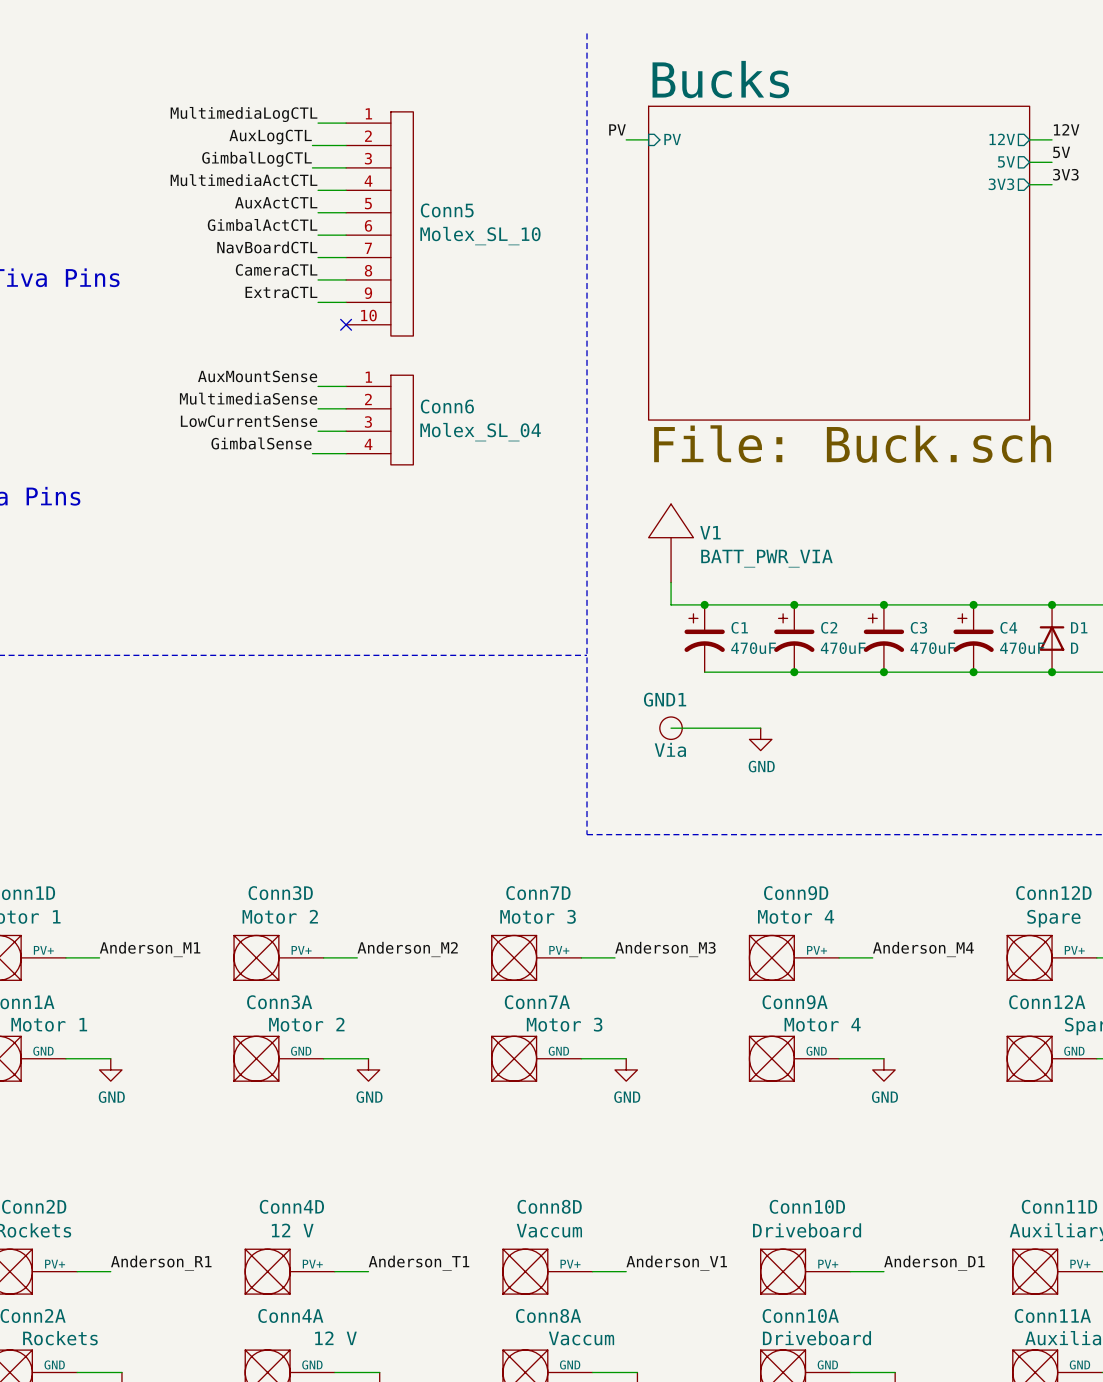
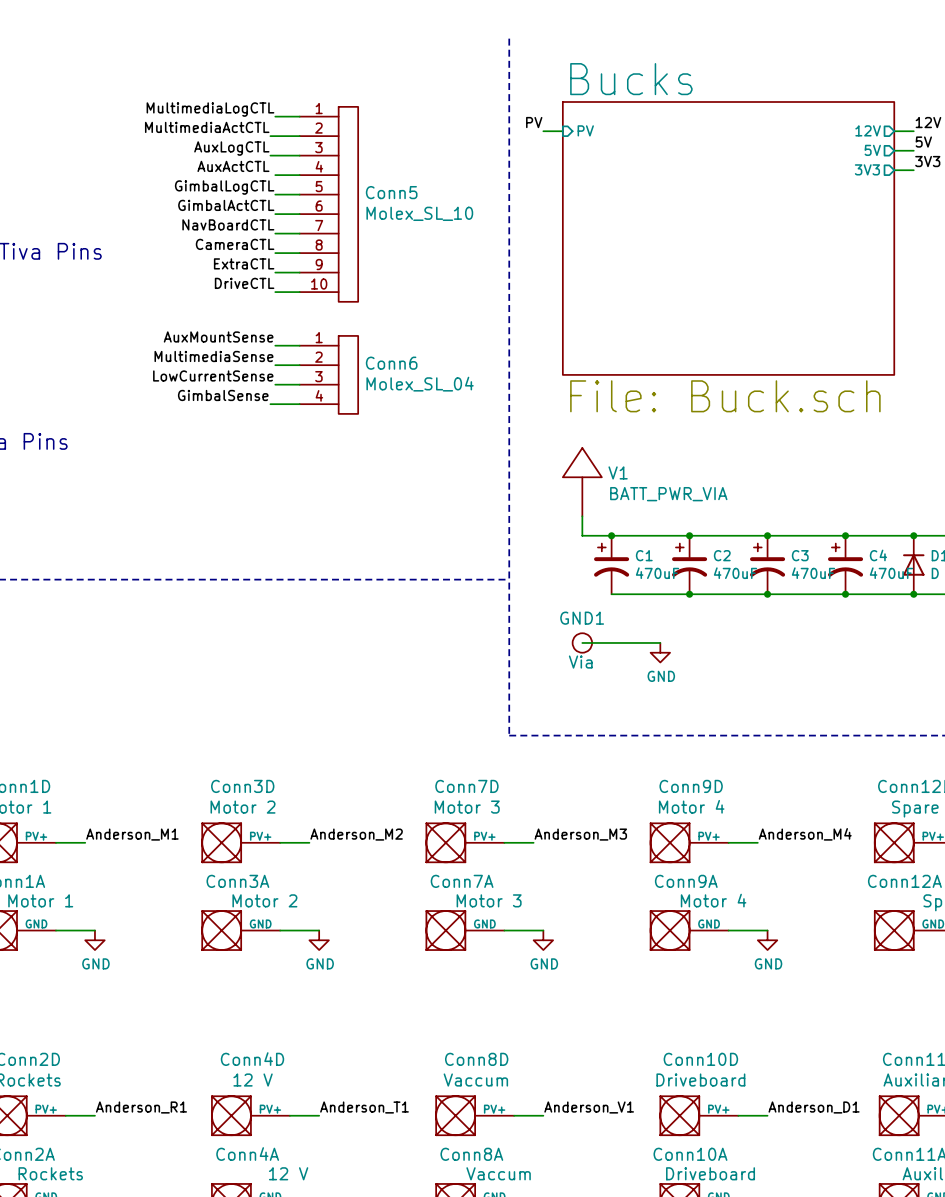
label: AuxLogCTL (270, 137) -> MultimediaActCTL (207, 127)
label: GimbalLogCTL (256, 159) -> AuxLogCTL (231, 148)
label: MultimediaActCTL (244, 180) -> AuxActCTL (233, 166)
label: AuxActCTL (276, 202) -> GimbalLogCTL (224, 187)
label: none -> DriveCTL (244, 283)
wire: none -> (275, 292) (299, 292)
no-connect mark: (346, 324) -> none

